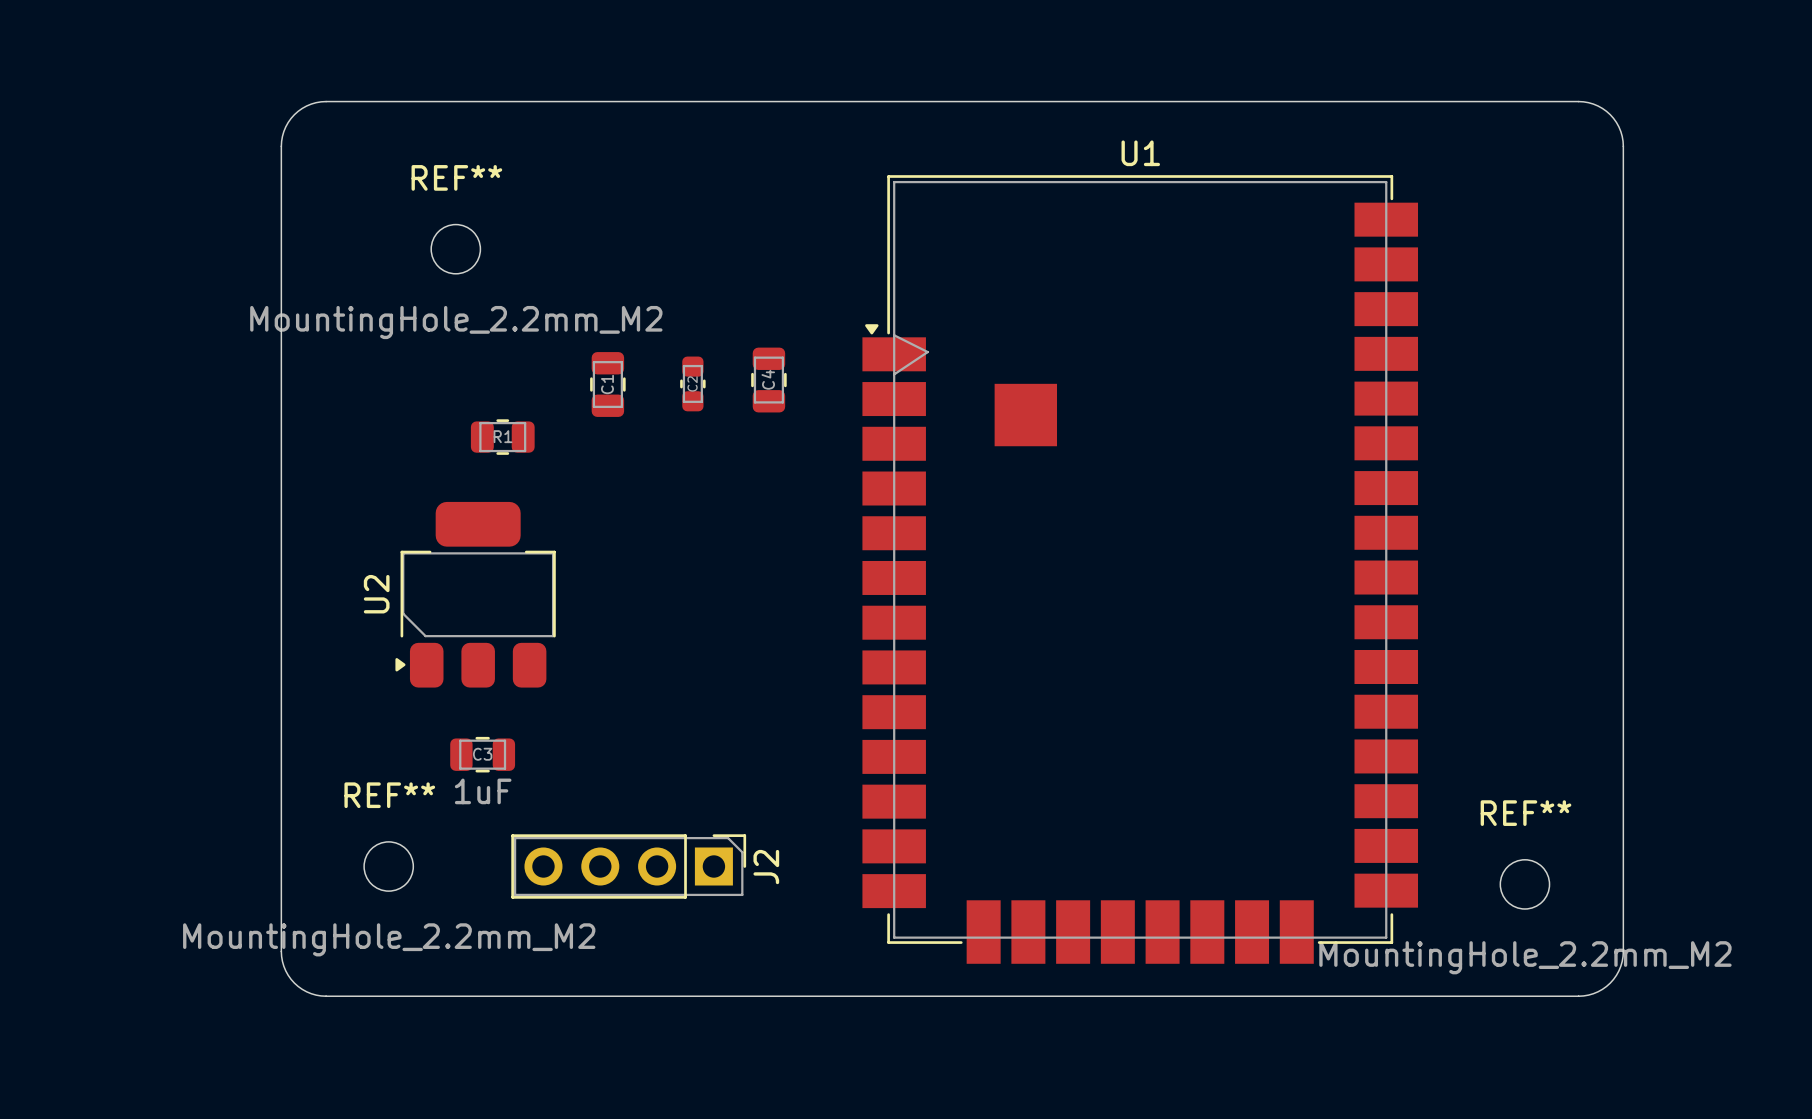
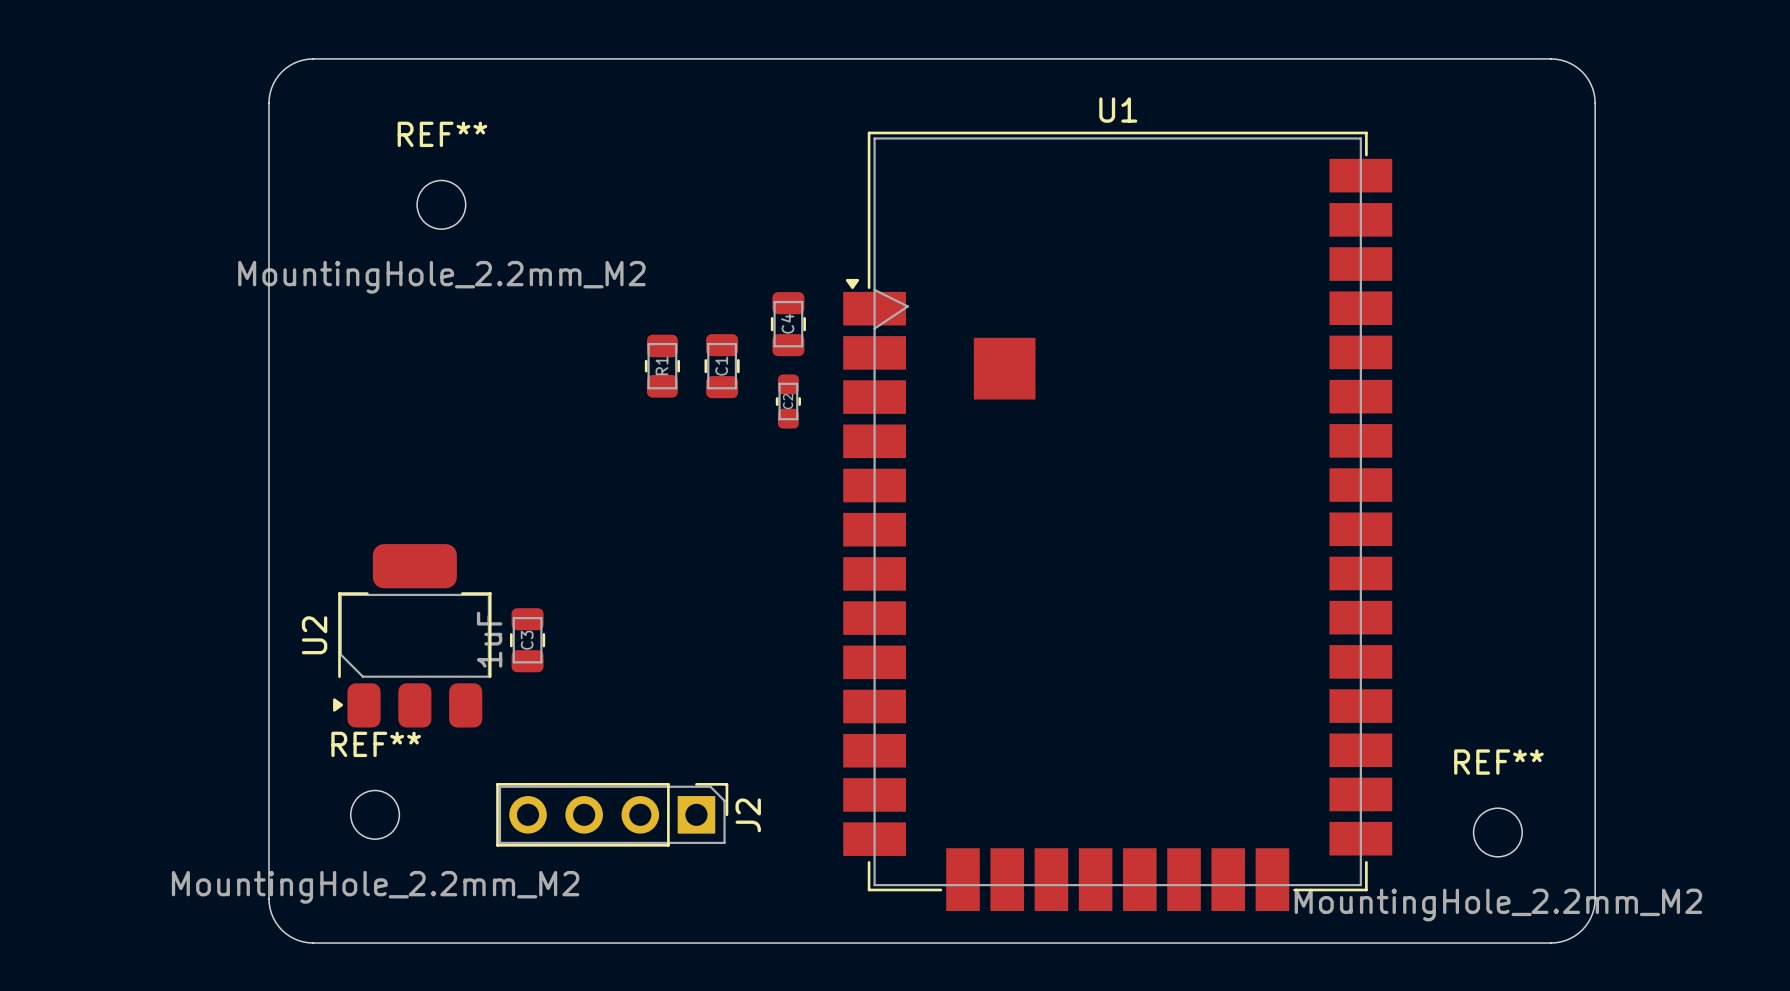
C4 position: (768, 380) -> (788, 324)
C2 position: (692, 383) -> (788, 401)
C1 position: (607, 384) -> (722, 366)
R1 rotation: 0° (502, 437) -> 90° clockwise (662, 366)
R1 position: (502, 437) -> (662, 366)
U2 position: (475, 594) -> (412, 635)
C3 rotation: 0° (482, 754) -> 90° clockwise (527, 640)
C3 position: (482, 754) -> (527, 640)

